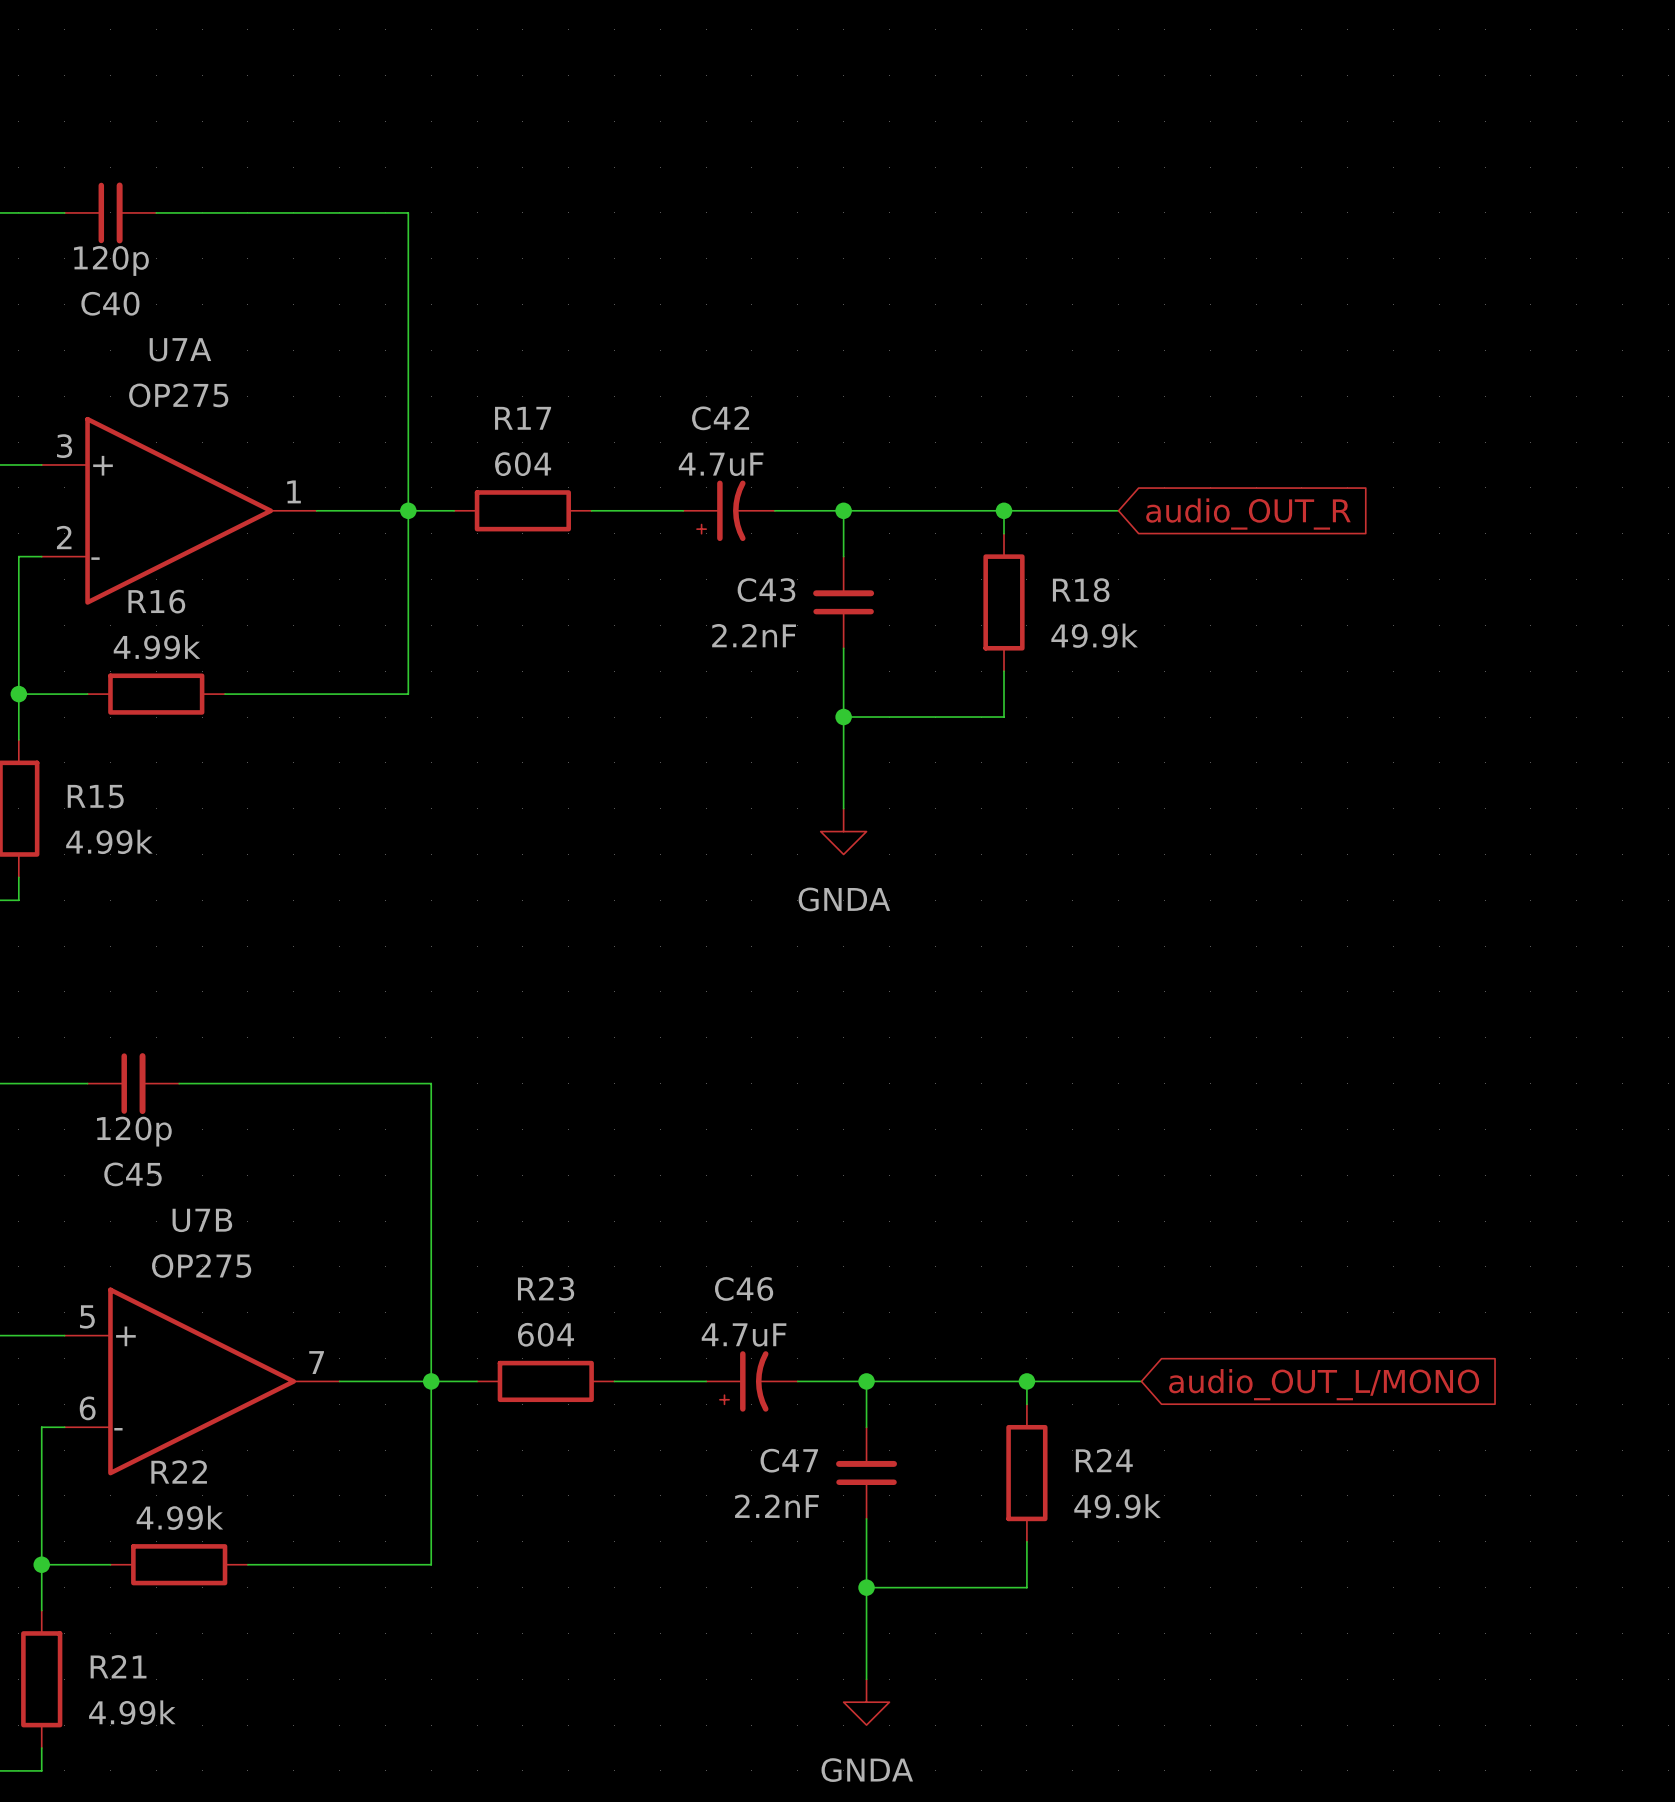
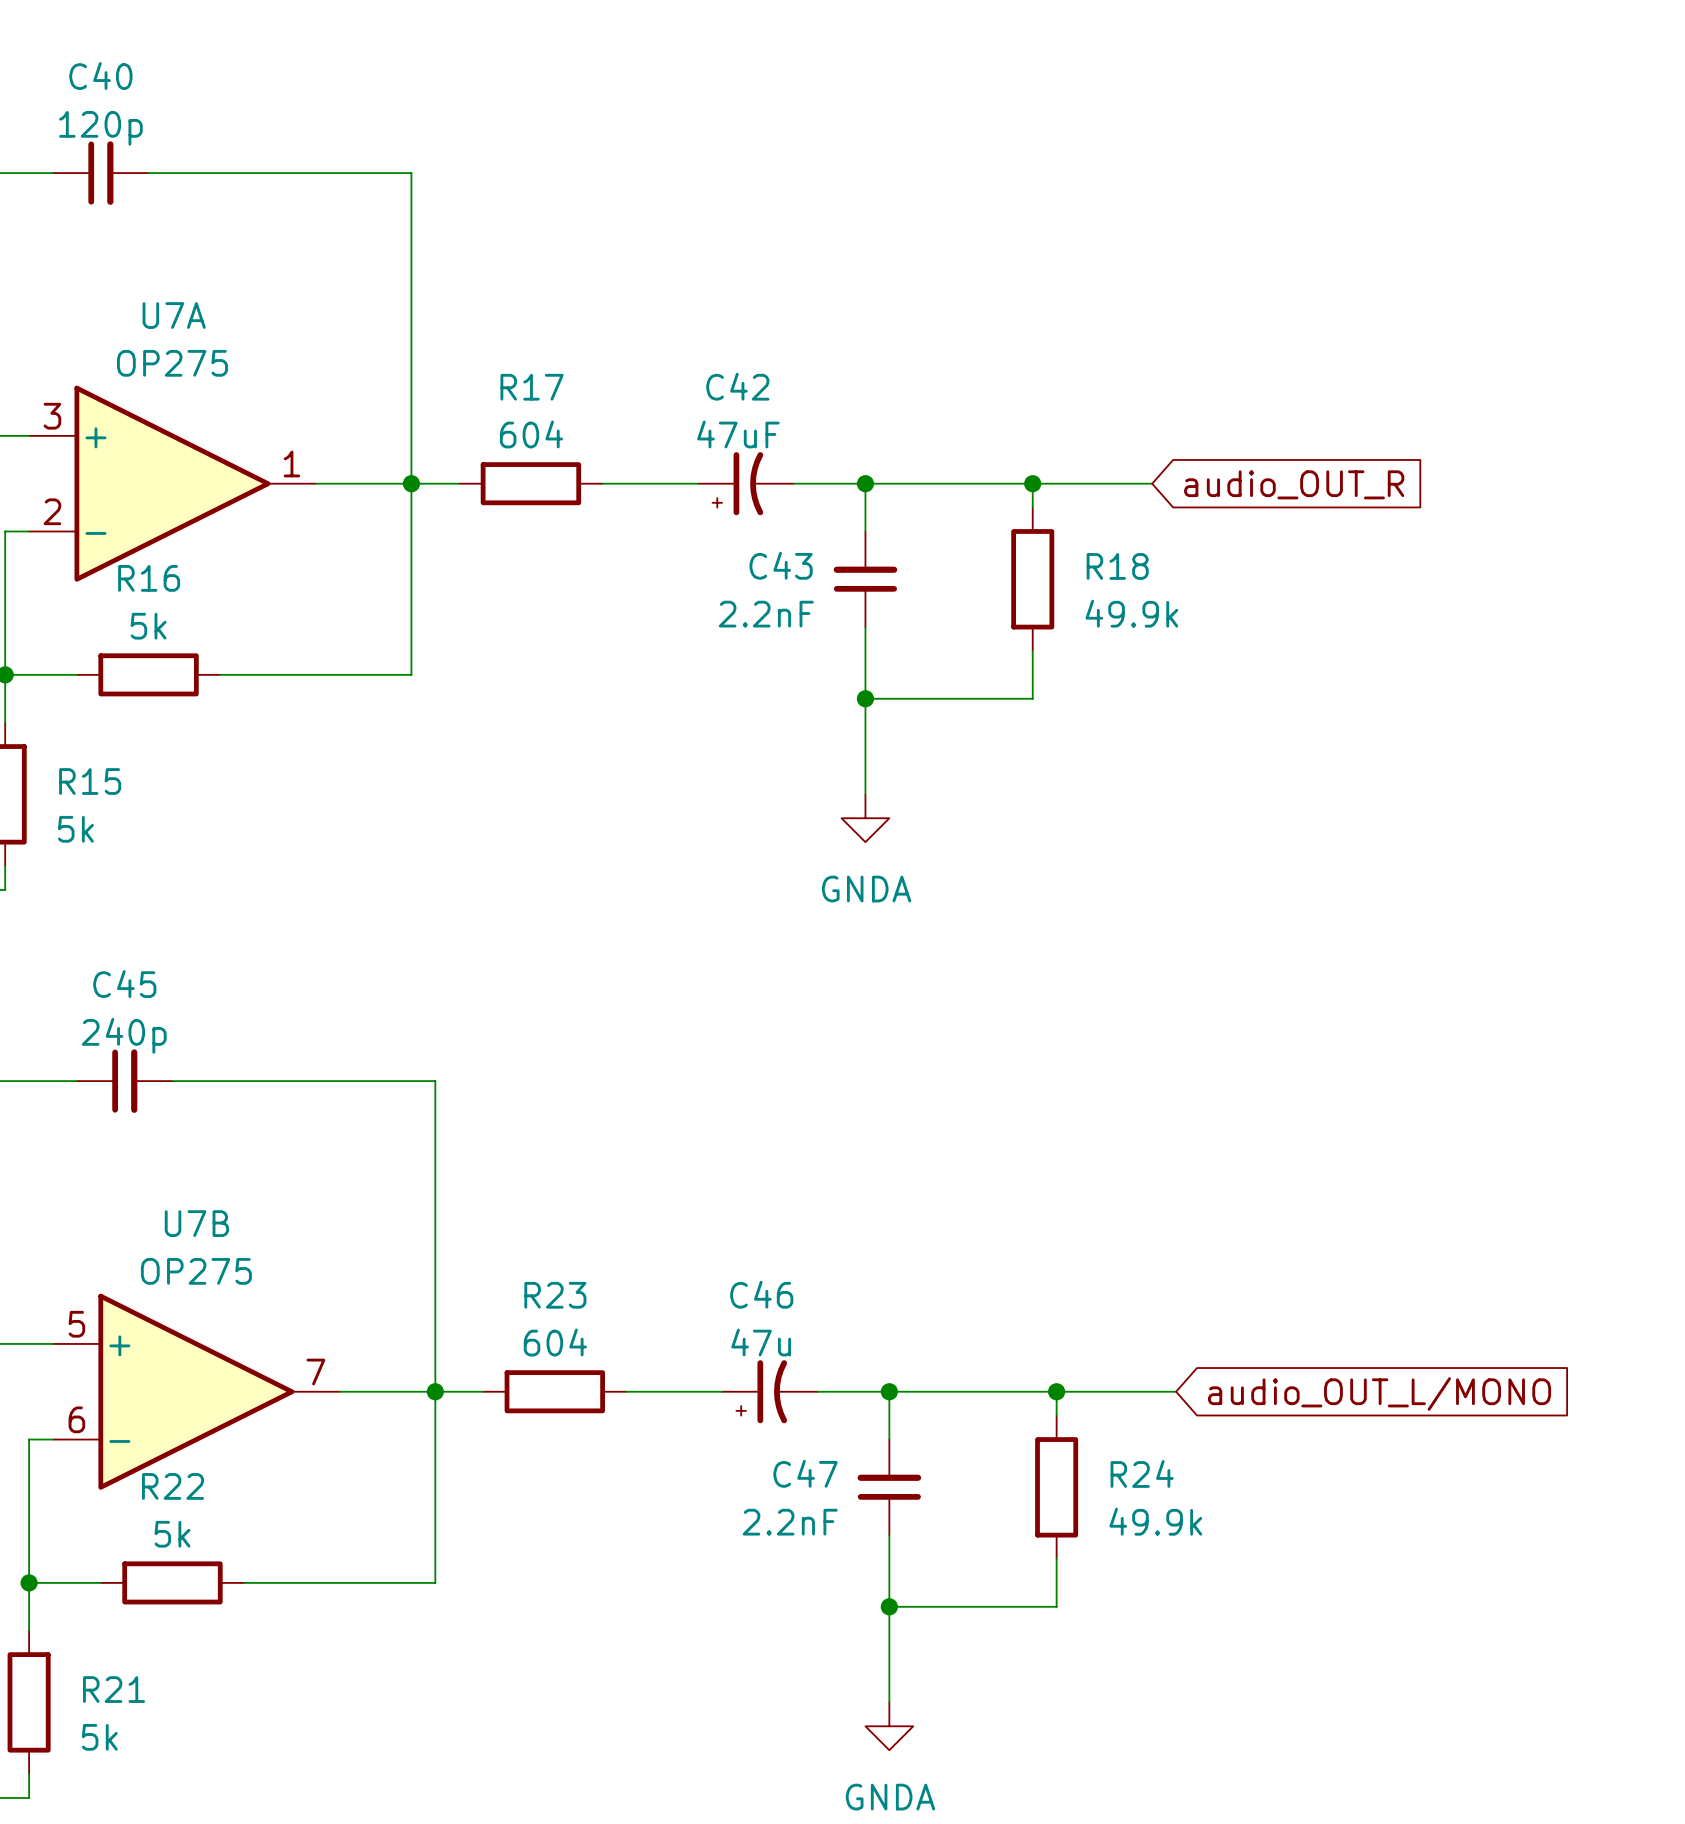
C40 value position: 120p (111, 260) -> 120p (100, 128)
C40 name position: C40 (110, 303) -> C40 (100, 76)
C42 value: 4.7uF (721, 464) -> 47uF (738, 434)
R16 value: 4.99k (157, 647) -> 5k (148, 626)
R15 value: 4.99k (109, 841) -> 5k (75, 829)
C45 value: 120p (134, 1131) -> 240p (124, 1035)
C45 name position: C45 (133, 1174) -> C45 (124, 984)
C46 value: 4.7uF (744, 1334) -> 47u (761, 1342)
R22 value: 4.99k (179, 1517) -> 5k (172, 1534)
R21 value: 4.99k (132, 1712) -> 5k (99, 1737)

